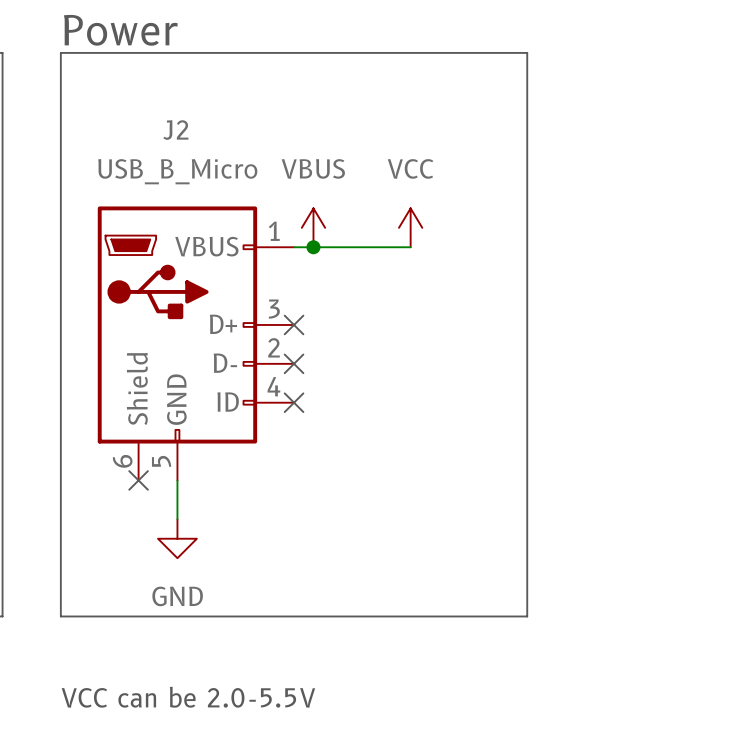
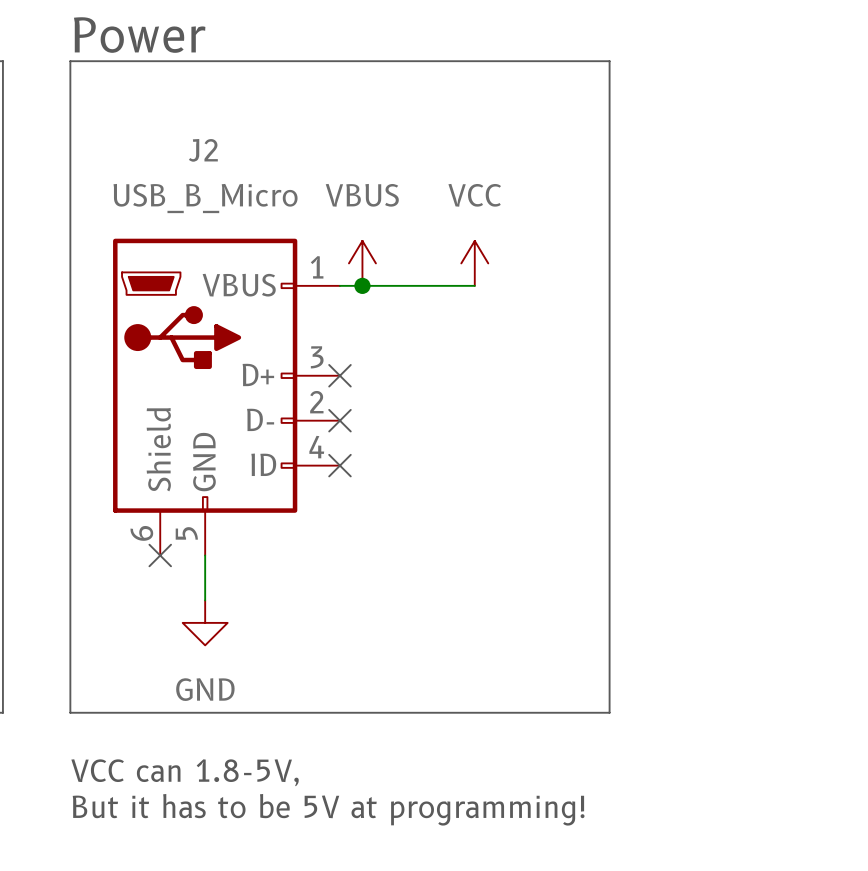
text: none -> VCC can 1.8-5V, (185, 772)
text: VCC can be 2.0-5.5V (188, 697) -> But it has to be 5V at programming! (328, 809)

